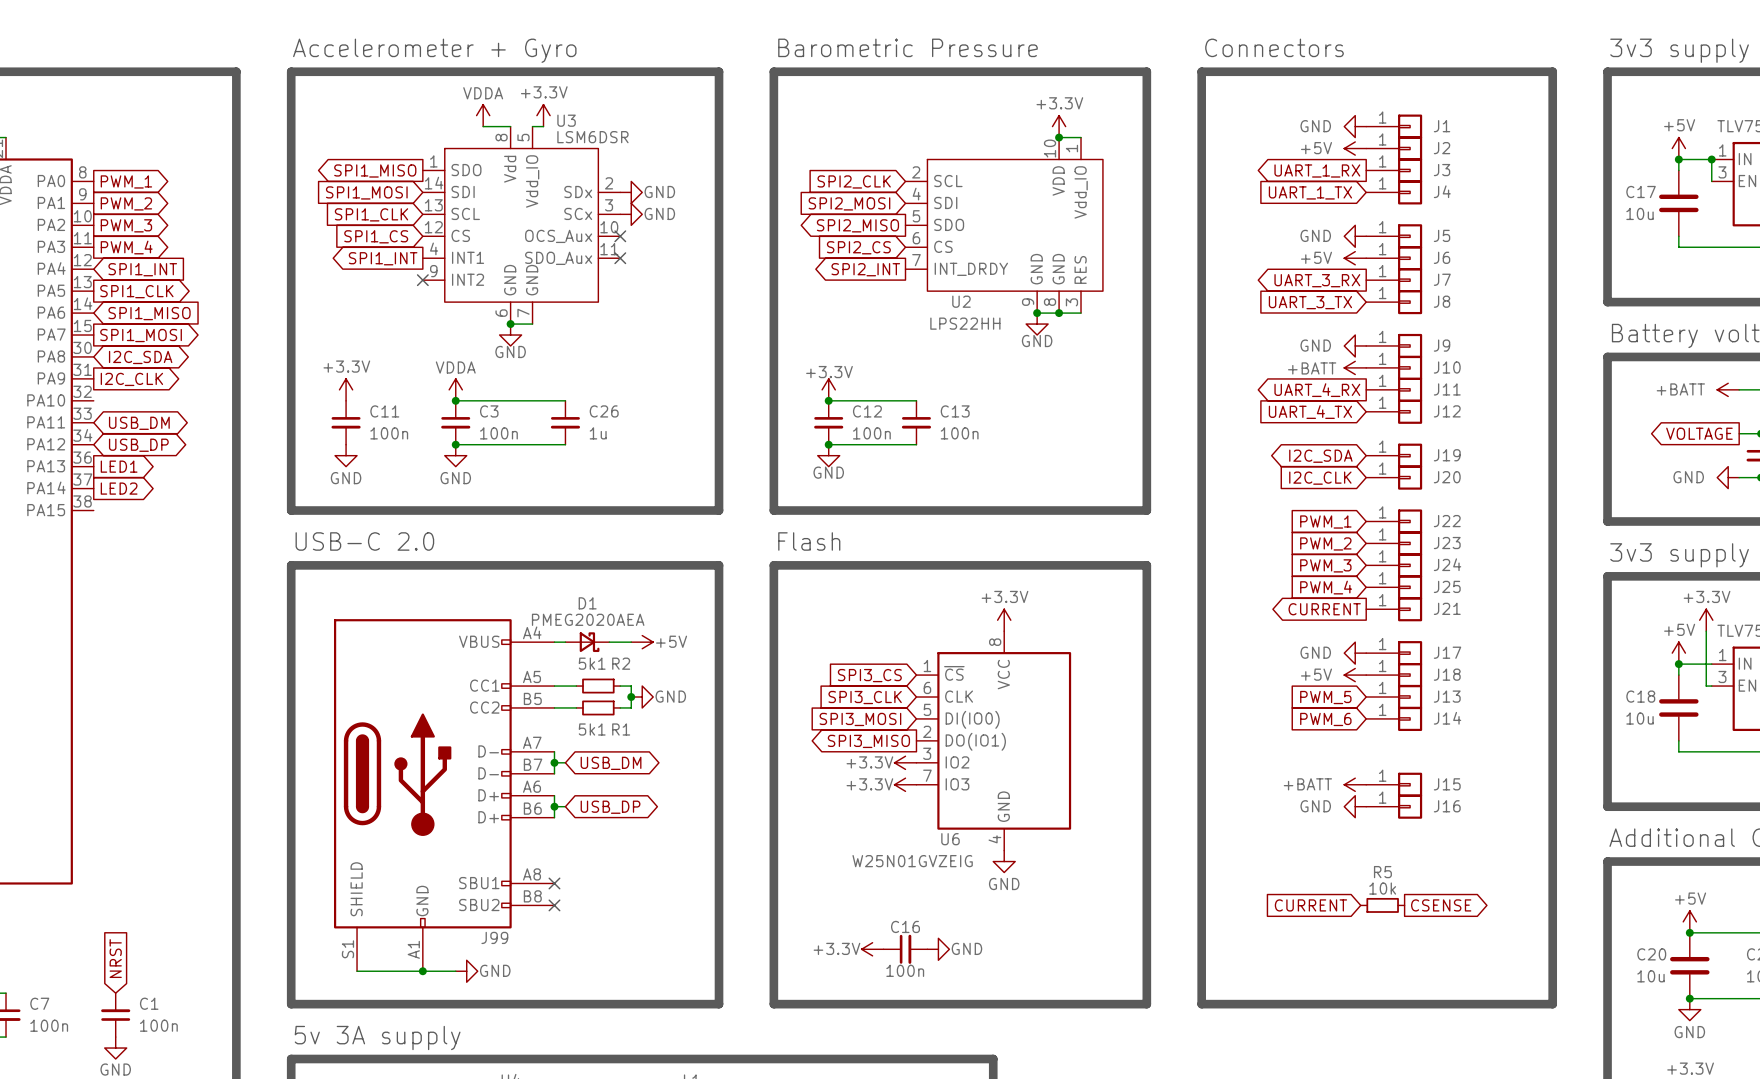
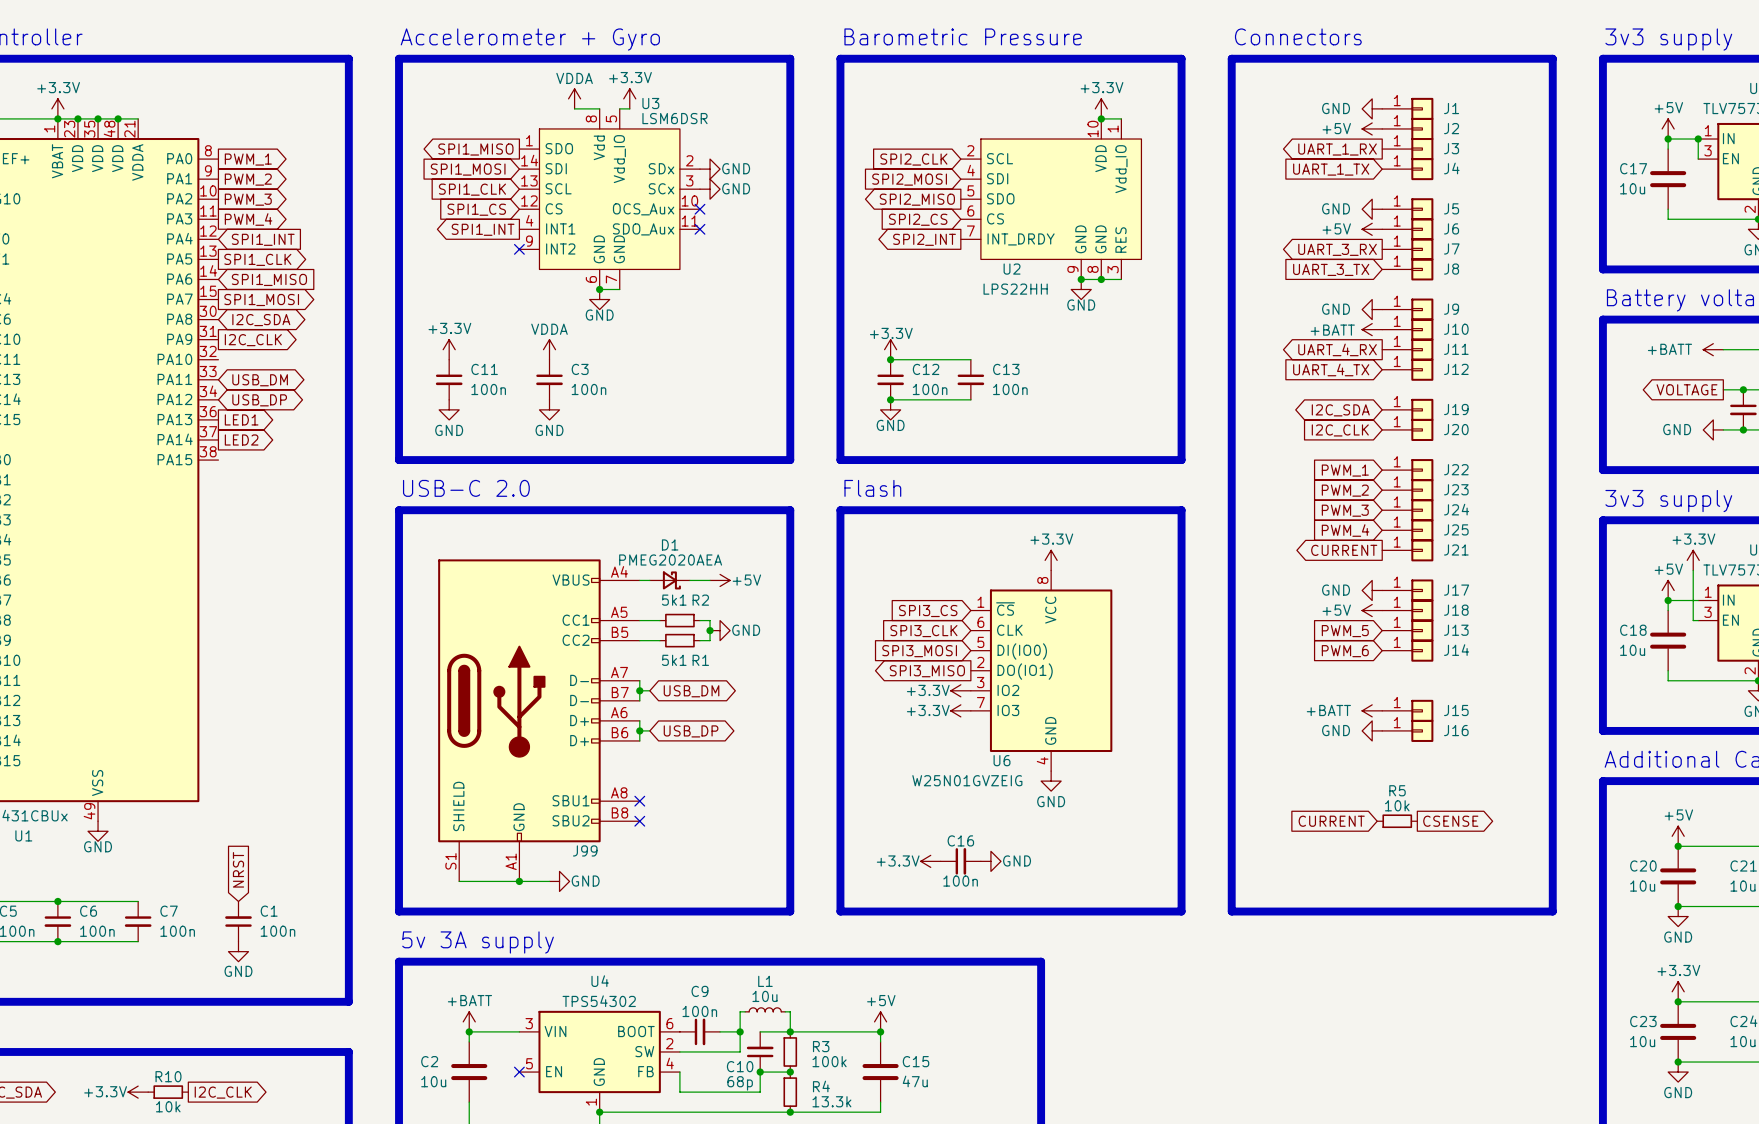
wire: (455, 400) (565, 400) -> none
junction: (455, 400) -> none
C26: 1u (565, 422) -> none
wire: (455, 444) (565, 444) -> none
junction: (455, 444) -> none

